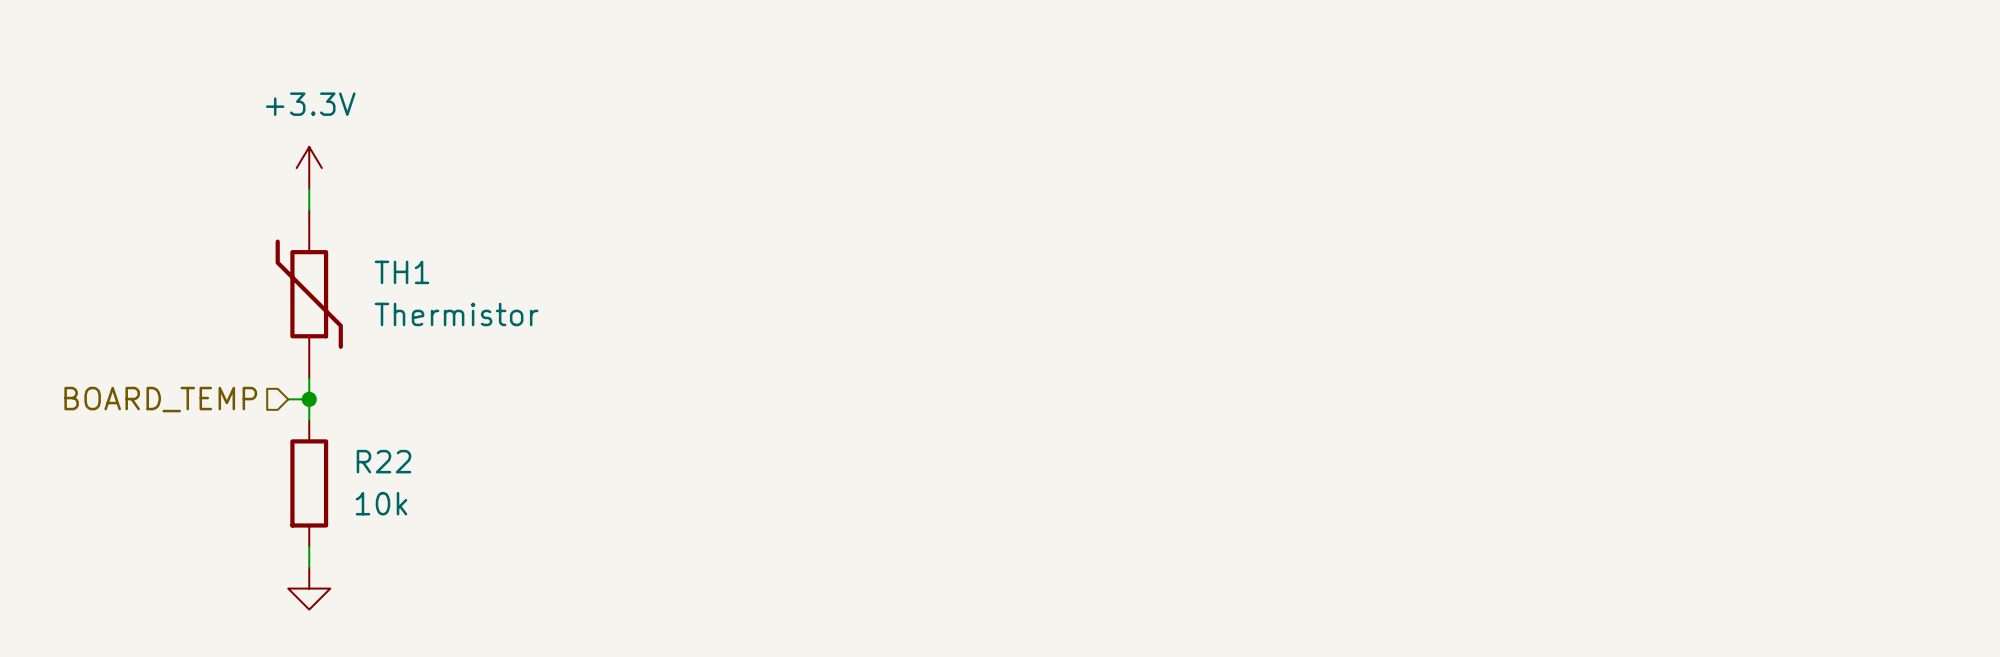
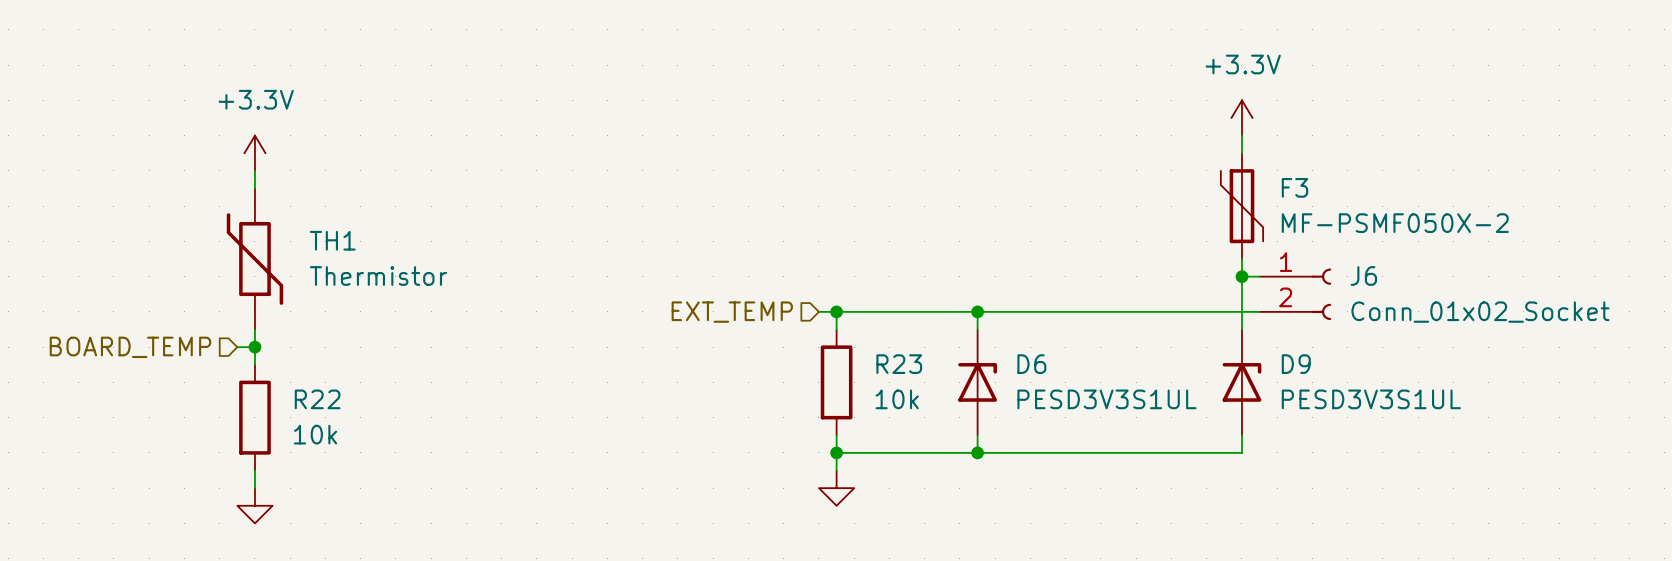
power symbol: none -> +3.3V (1241, 118)
wire: none -> (1241, 135) (1241, 153)
F3: none -> MF-PSMF050X-2 (1241, 206)
wire: none -> (1241, 259) (1241, 329)
wire: none -> (1241, 276) (1259, 276)
junction: none -> (1241, 276)
J6: none -> Conn_01x02_Socket (1295, 294)
hierarchical label: none -> EXT_TEMP (732, 312)
wire: none -> (818, 311) (1259, 311)
wire: none -> (836, 311) (836, 329)
junction: none -> (836, 311)
wire: none -> (977, 311) (977, 329)
junction: none -> (977, 311)
R23: none -> 10k (836, 382)
D6: none -> PESD3V3S1UL (977, 382)
D9: none -> PESD3V3S1UL (1241, 382)
wire: none -> (836, 435) (836, 470)
wire: none -> (977, 435) (977, 452)
wire: none -> (1241, 435) (1241, 452) (836, 452)
junction: none -> (836, 452)
junction: none -> (977, 452)
power symbol: none -> (836, 488)

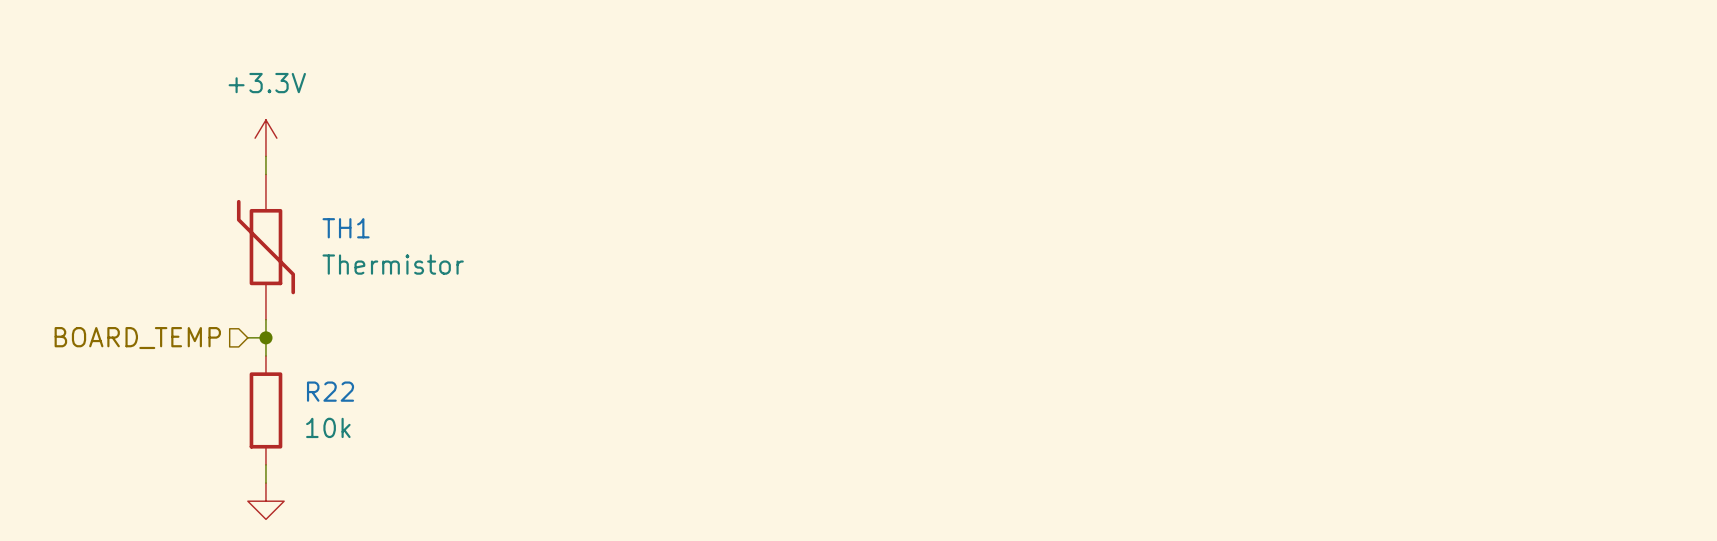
power symbol: +3.3V (1241, 118) -> none
wire: (1241, 135) (1241, 153) -> none
F3: MF-PSMF050X-2 (1241, 206) -> none
wire: (1241, 259) (1241, 329) -> none
wire: (1241, 276) (1259, 276) -> none
junction: (1241, 276) -> none
J6: Conn_01x02_Socket (1295, 294) -> none
wire: (818, 311) (1259, 311) -> none
wire: (836, 311) (836, 329) -> none
junction: (836, 311) -> none
wire: (977, 311) (977, 329) -> none
junction: (977, 311) -> none
hierarchical label: EXT_TEMP (732, 312) -> none
R23: 10k (836, 382) -> none
D6: PESD3V3S1UL (977, 382) -> none
D9: PESD3V3S1UL (1241, 382) -> none
wire: (836, 435) (836, 470) -> none
wire: (977, 435) (977, 452) -> none
wire: (1241, 435) (1241, 452) (836, 452) -> none
junction: (836, 452) -> none
junction: (977, 452) -> none
power symbol: (836, 488) -> none

